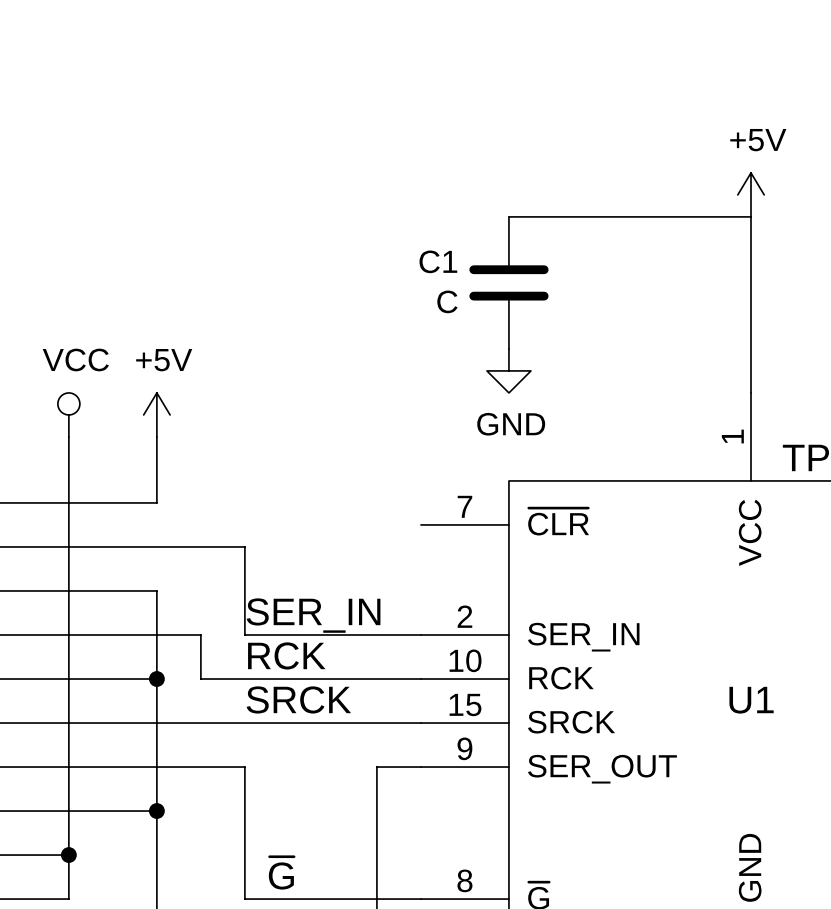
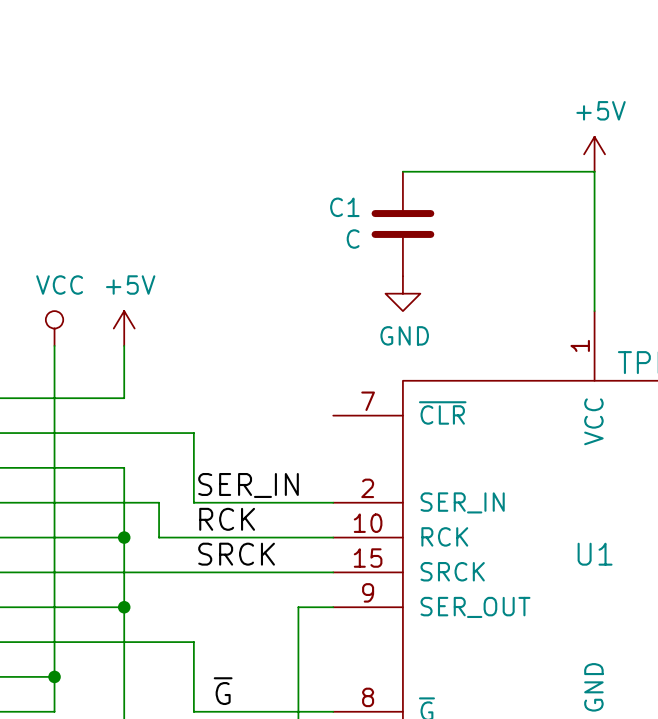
wire: (156, 767) (244, 767) (244, 811) -> (124, 642) (193, 642)
junction position: (156, 811) -> (124, 607)

